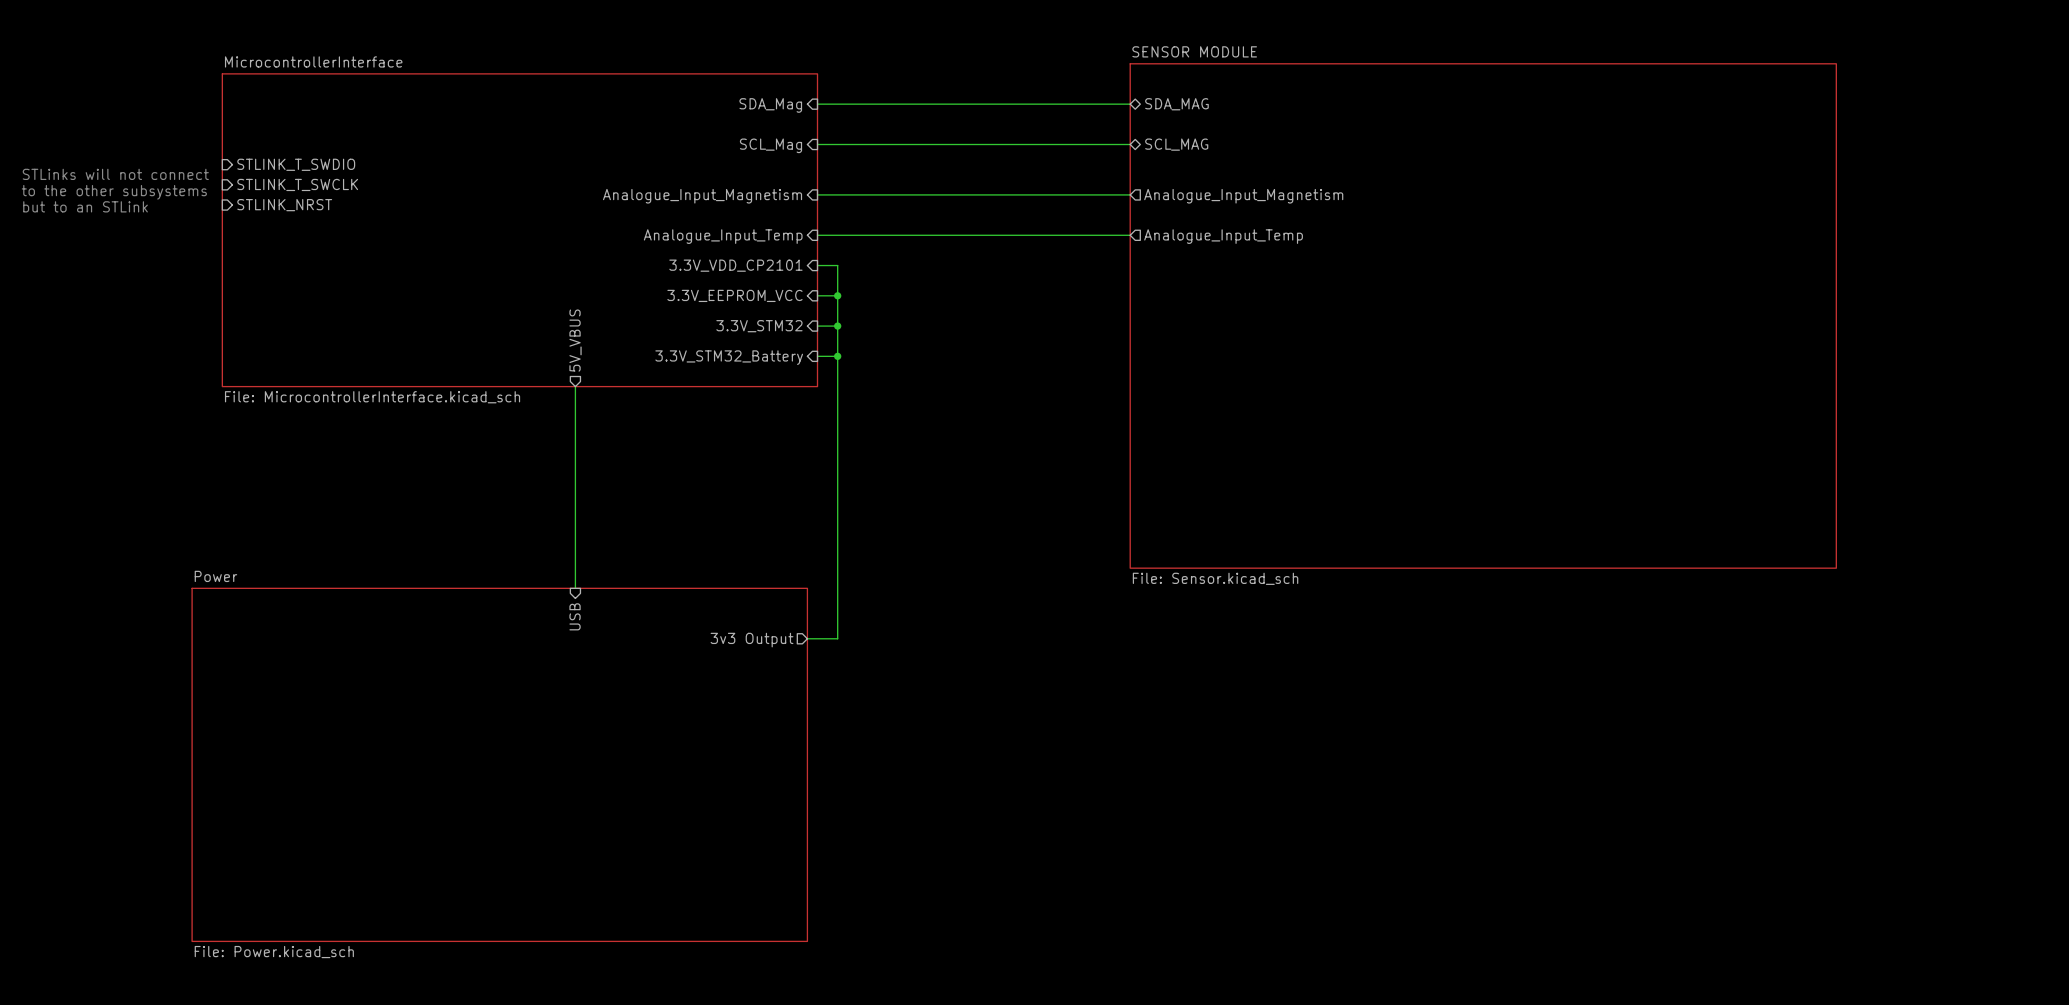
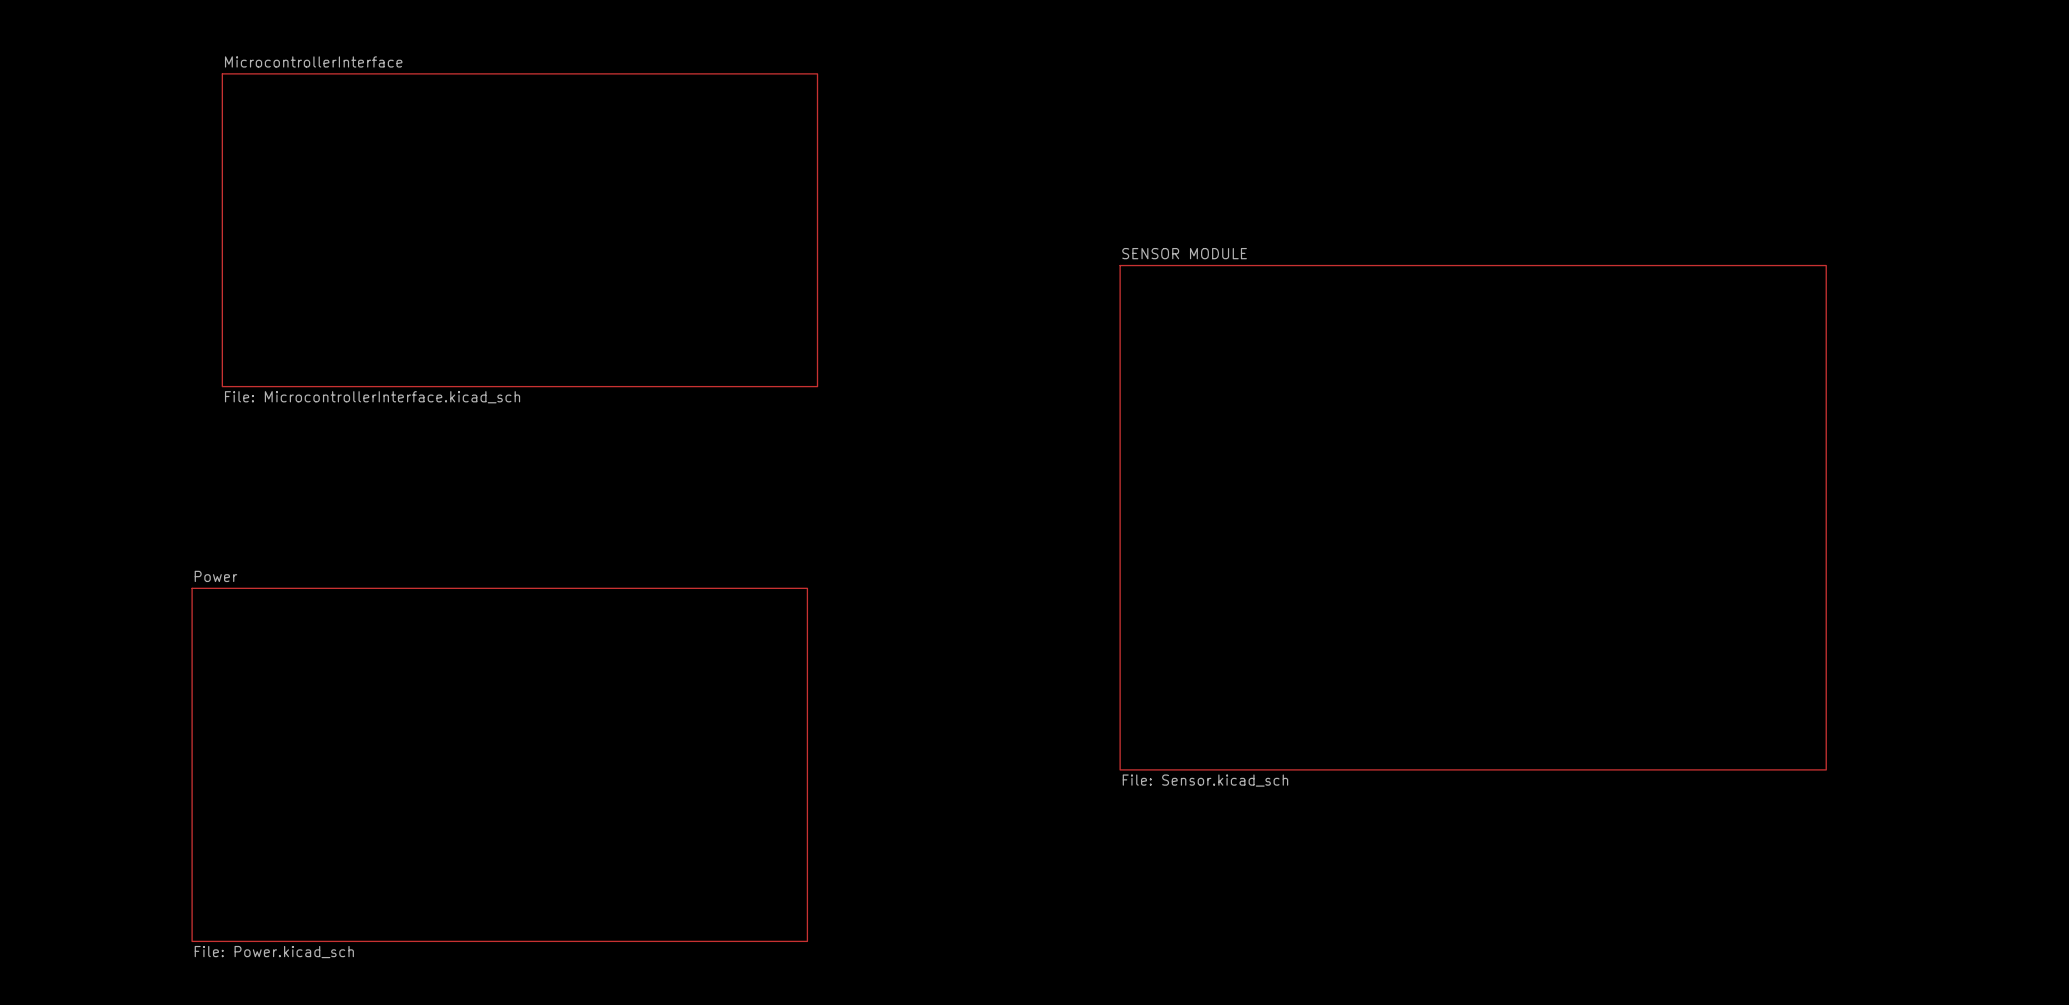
wire: (817, 104) (1130, 104) -> none
sheet pin: SDA_MAG (1176, 104) -> none
sheet pin: SDA_Mag (770, 105) -> none
wire: (817, 144) (1130, 144) -> none
sheet pin: SCL_MAG (1176, 144) -> none
sheet pin: SCL_Mag (770, 145) -> none
sheet pin: STLINK_T_SWDIO (296, 164) -> none
text: STLinks will not connect (115, 174) -> none
sheet pin: STLINK_T_SWCLK (297, 184) -> none
text: to the other subsystems (114, 192) -> none
wire: (817, 194) (1130, 194) -> none
sheet pin: Analogue_Input_Magnetism (702, 196) -> none
sheet pin: Analogue_Input_Magnetism (1243, 196) -> none
sheet pin: STLINK_NRST (284, 205) -> none
text: but to an STLink (85, 206) -> none
wire: (817, 235) (1130, 235) -> none
sheet pin: Analogue_Input_Temp (723, 236) -> none
sheet pin: Analogue_Input_Temp (1223, 236) -> none
sheet pin: 3.3V_VDD_CP2101 (735, 265) -> none
wire: (817, 265) (837, 265) (837, 638) (807, 638) -> none
sheet pin: 3.3V_EEPROM_VCC (734, 295) -> none
wire: (817, 295) (837, 295) -> none
junction: (837, 295) -> none
sheet SENSOR MODULE: File: Sensor.kicad_sch (1483, 315) -> none
sheet pin: 3.3V_STM32 (759, 326) -> none
wire: (817, 326) (837, 326) -> none
junction: (837, 326) -> none
sheet pin: 5V_VBUS (575, 340) -> none
wire: (817, 356) (837, 356) -> none
junction: (837, 356) -> none
sheet pin: 3.3V_STM32_Battery (729, 357) -> none
wire: (575, 386) (575, 588) -> none
sheet SENSOR MODULE: none -> File: Sensor.kicad_sch (1473, 517)
sheet pin: USB (575, 616) -> none
sheet pin: 3v3 Output (752, 640) -> none

